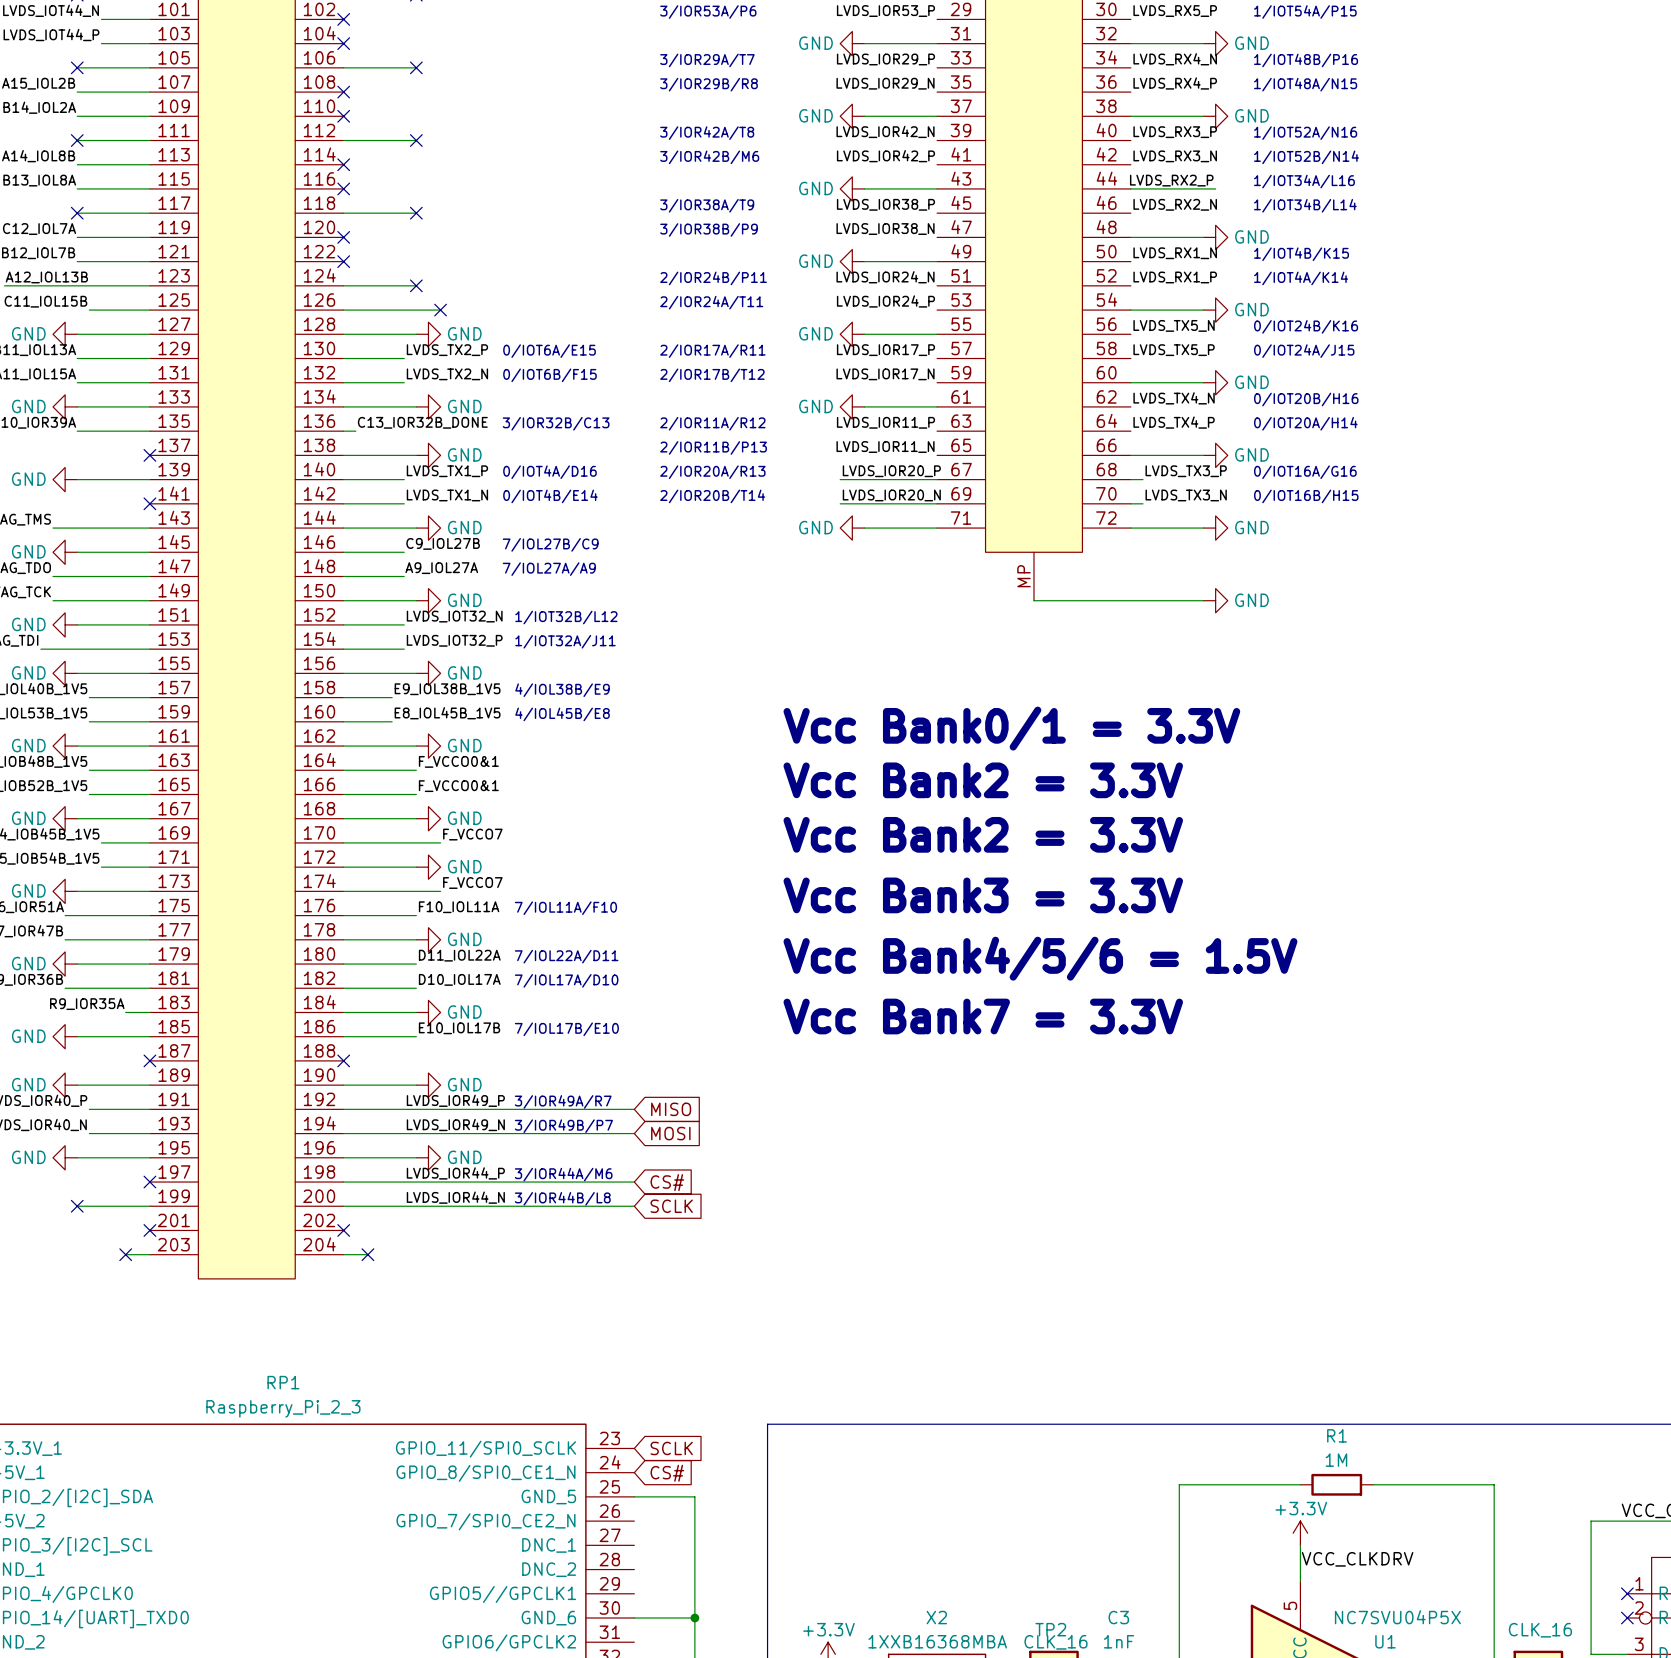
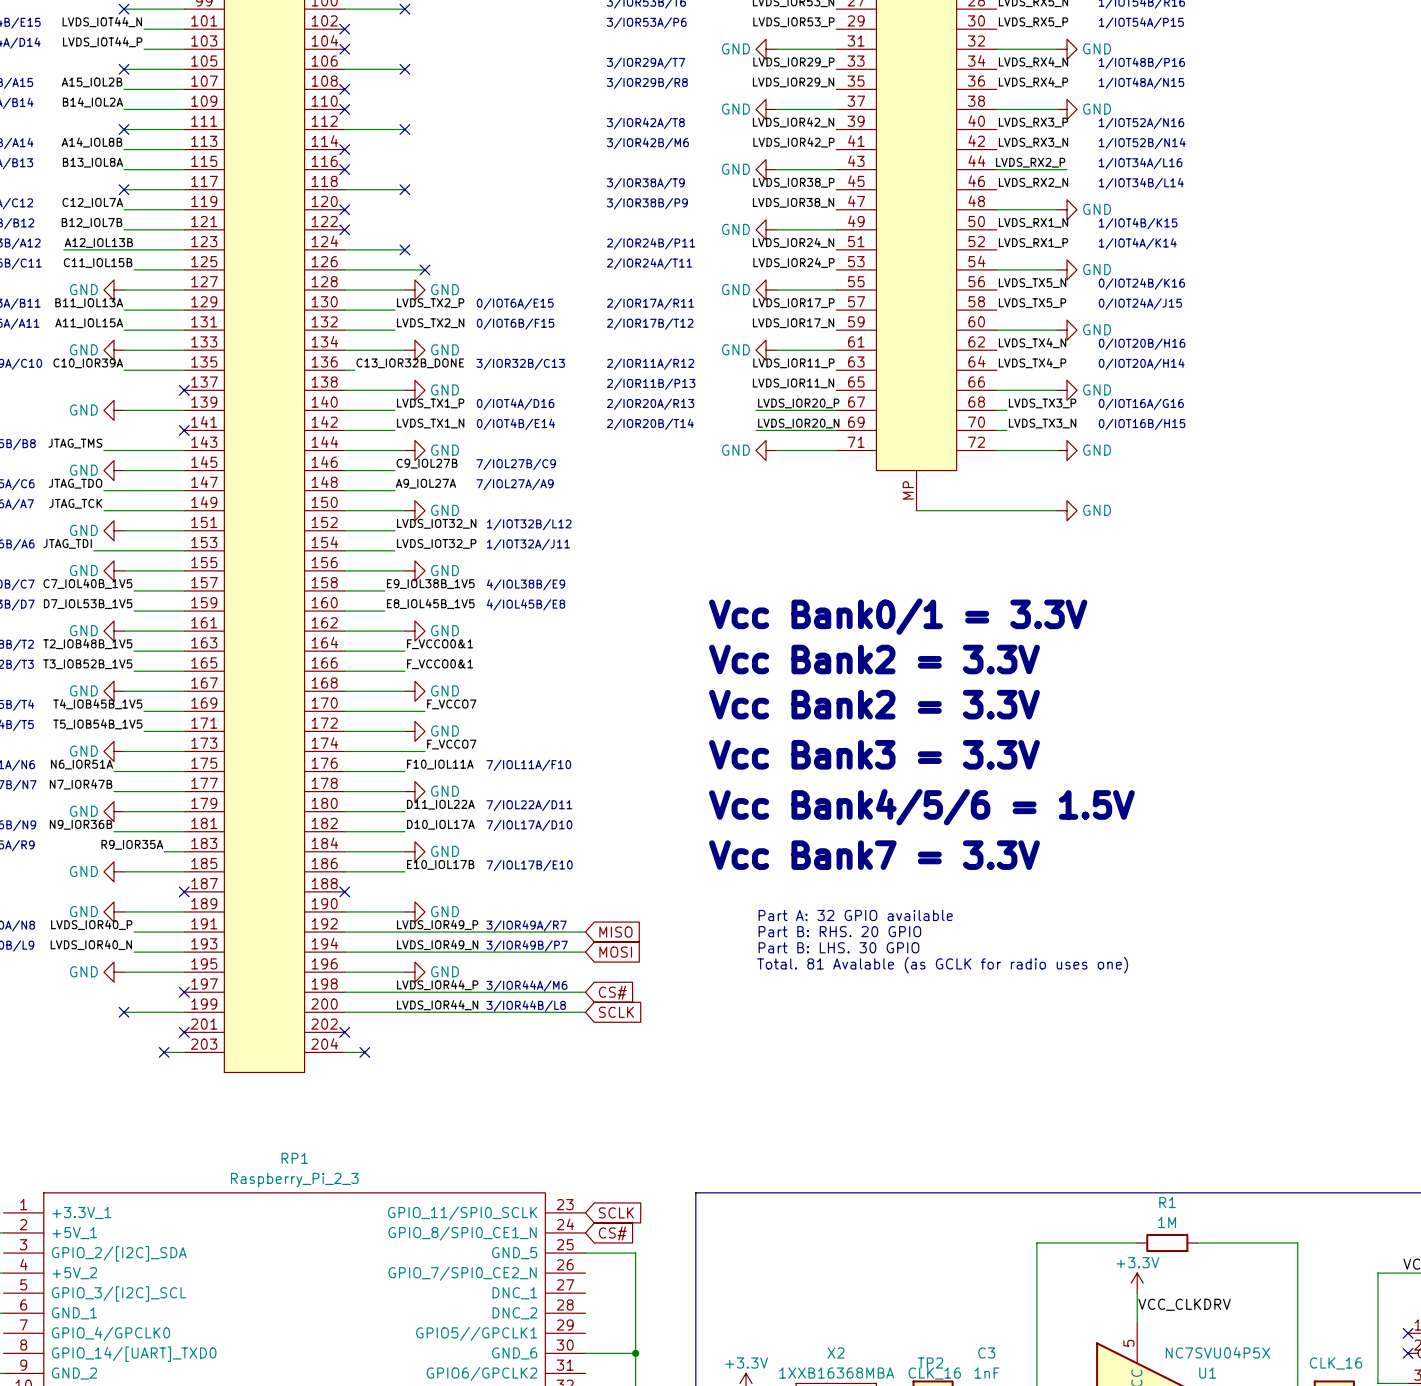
text: none -> Part A: 32 GPIO available (855, 915)
text: none -> Part B: RHS. 20 GPIO (839, 931)
text: none -> Part B: LHS. 30 GPIO (838, 947)
text: none -> Total. 81 Avalable (as GCLK for radio uses one) (942, 965)

